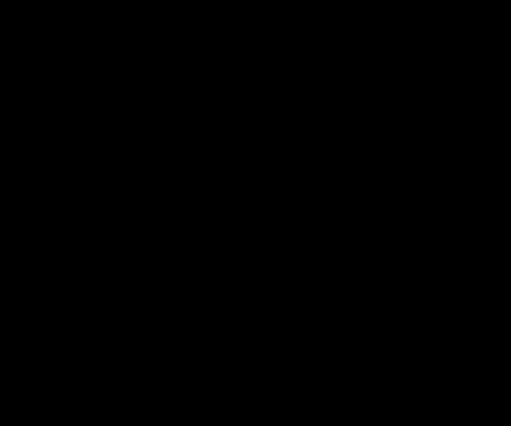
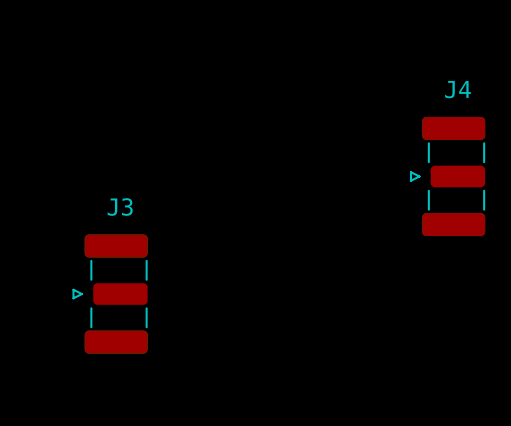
J4: none -> (447, 176)
J3: none -> (110, 294)

